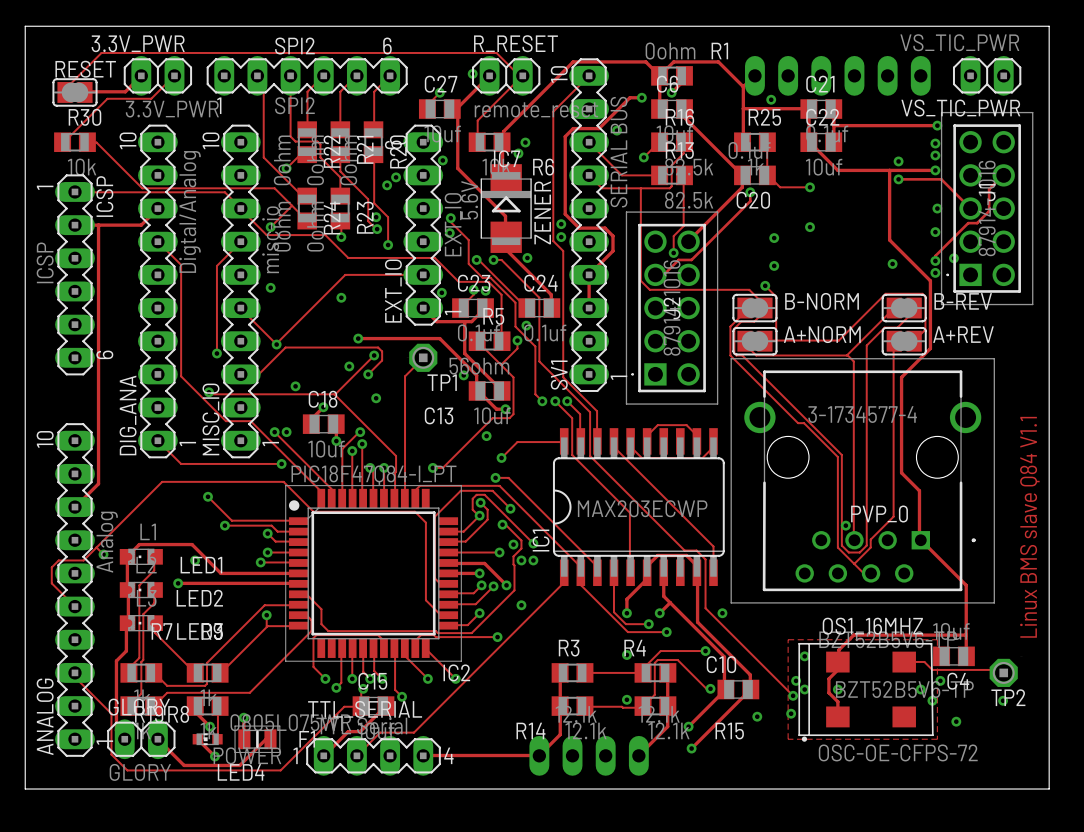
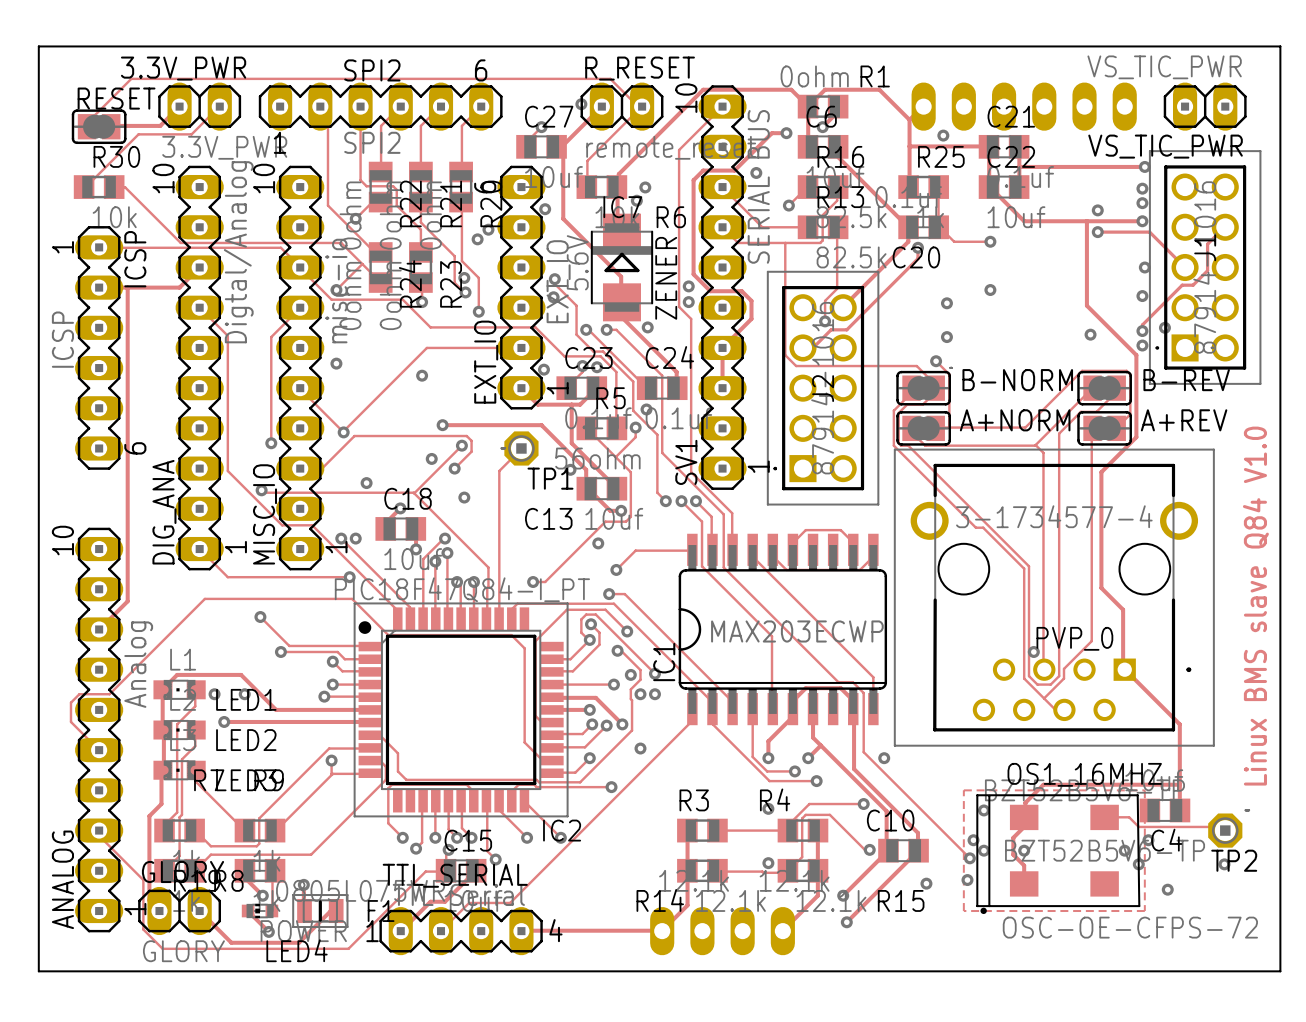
text: Linux BMS slave Q84 V1.1 (1029, 527) -> Linux BMS slave Q84 V1.0 (1255, 606)
track: (96, 547) (103, 554) -> none
via position: (103, 554) -> (214, 694)

